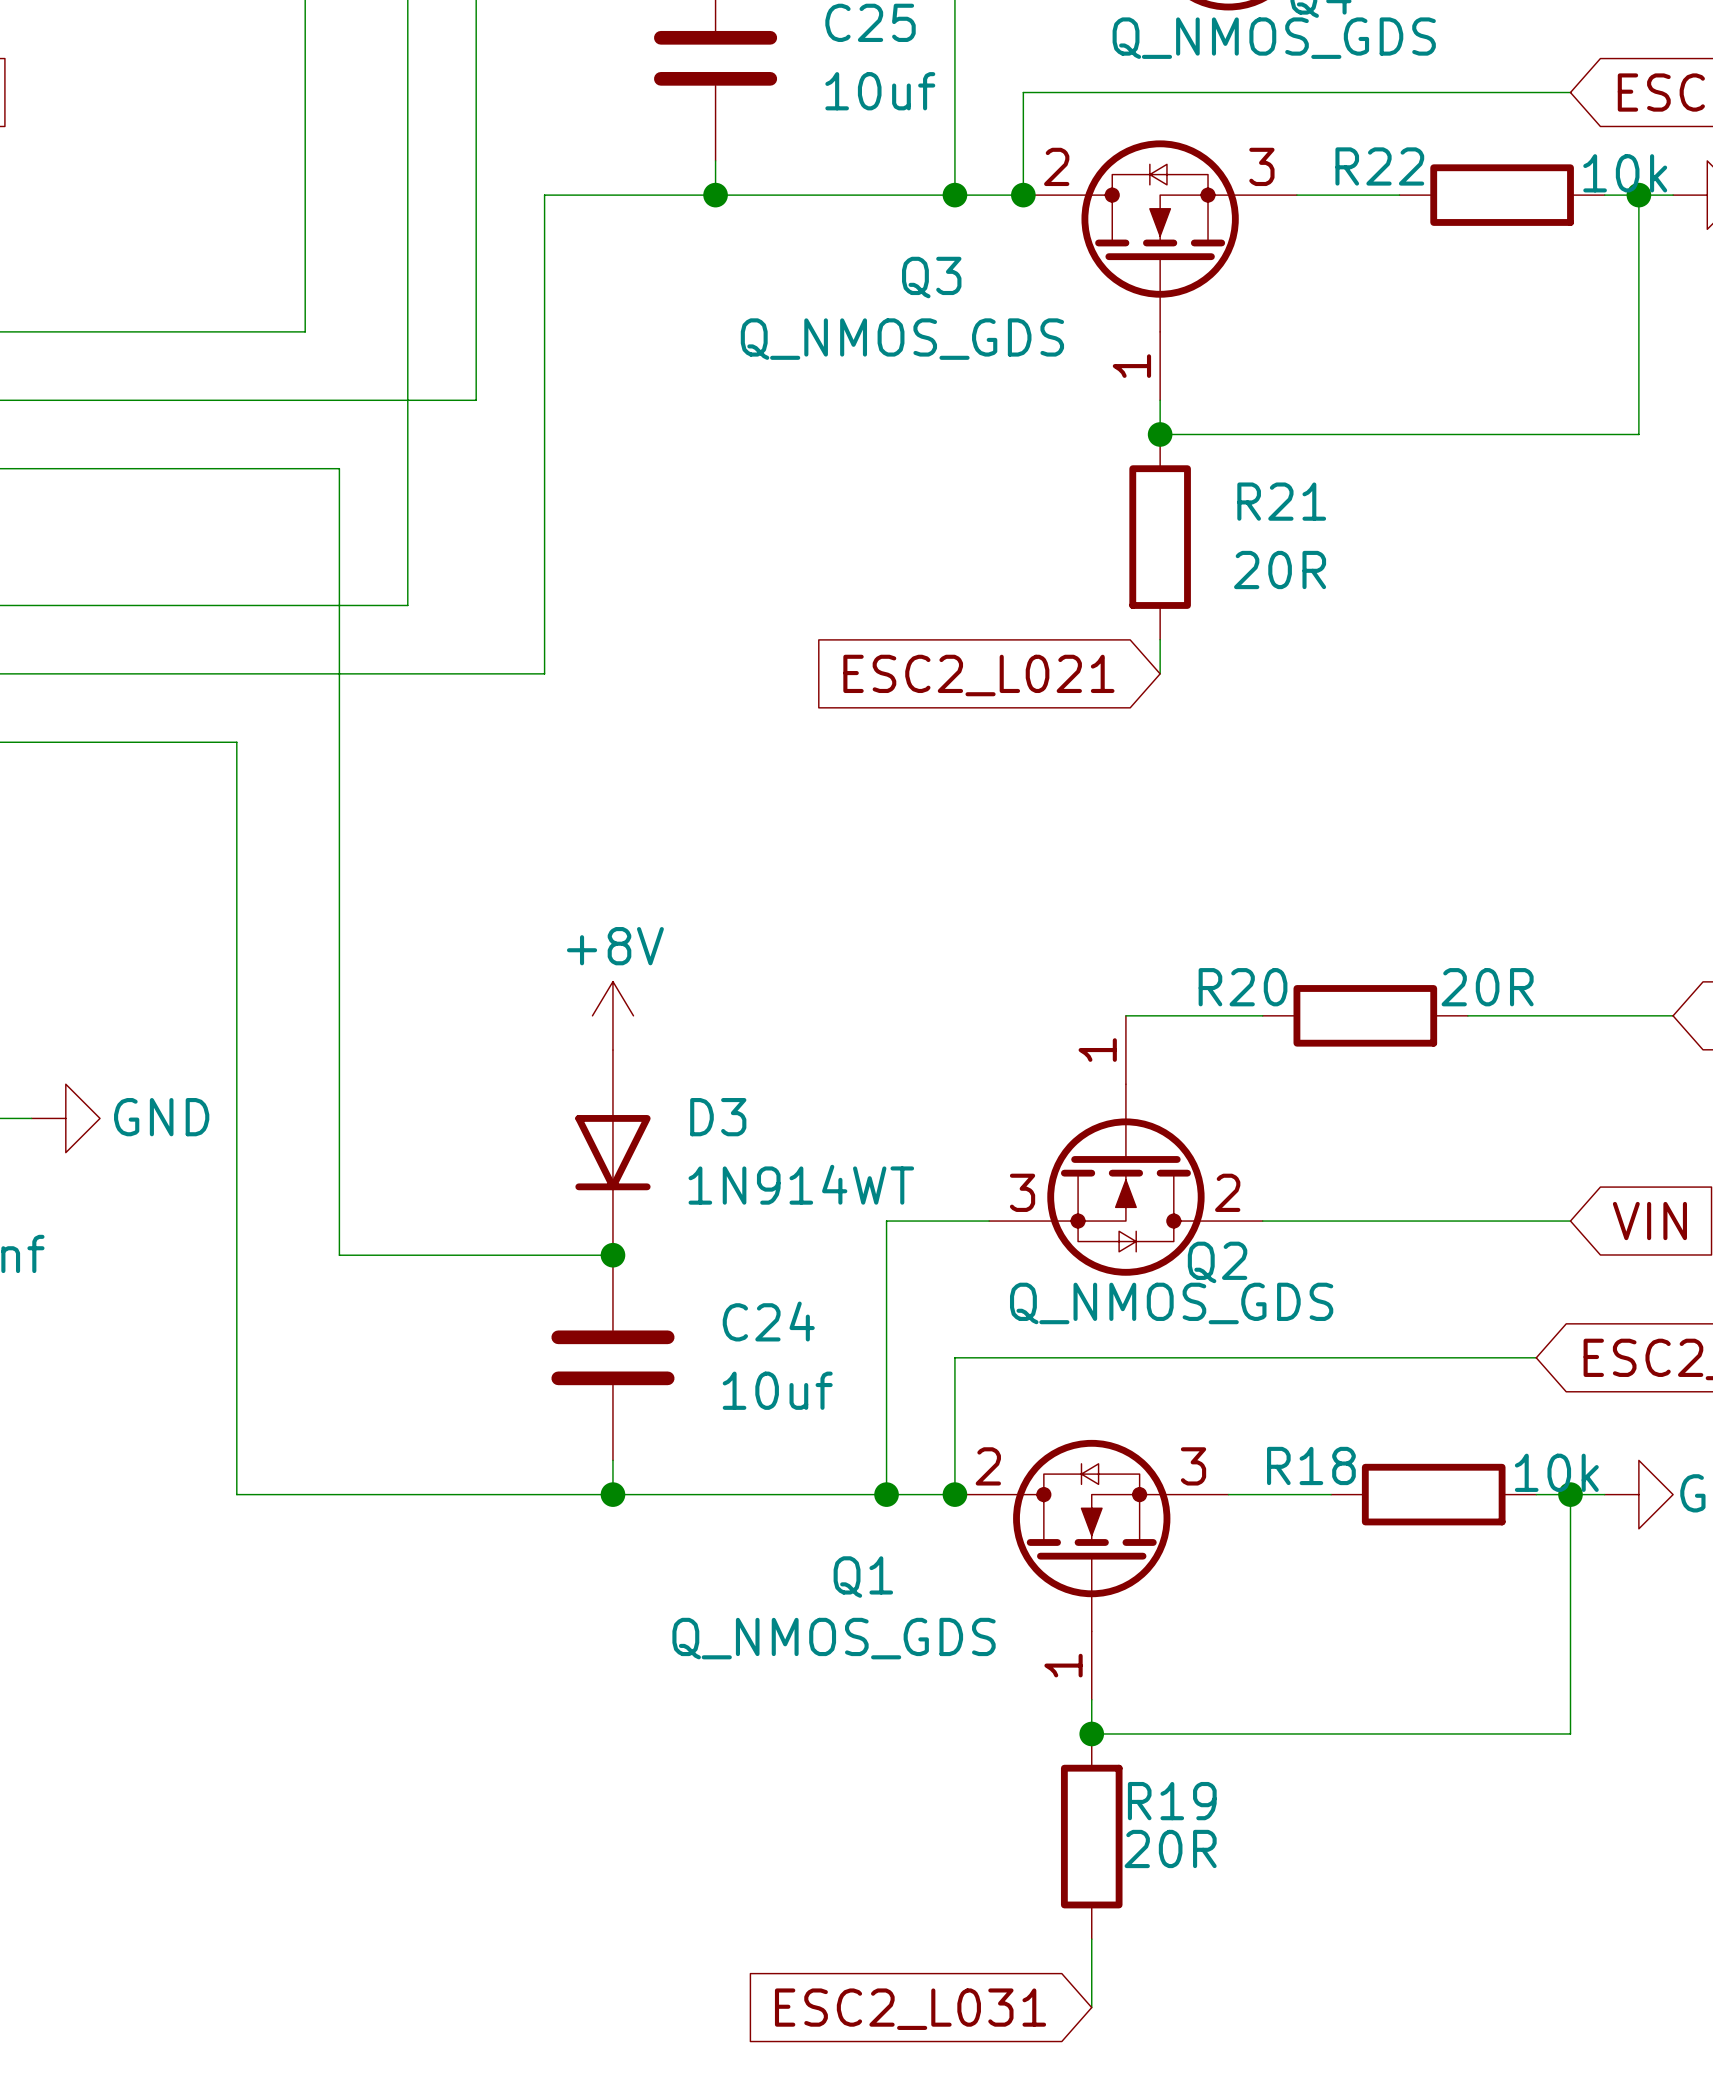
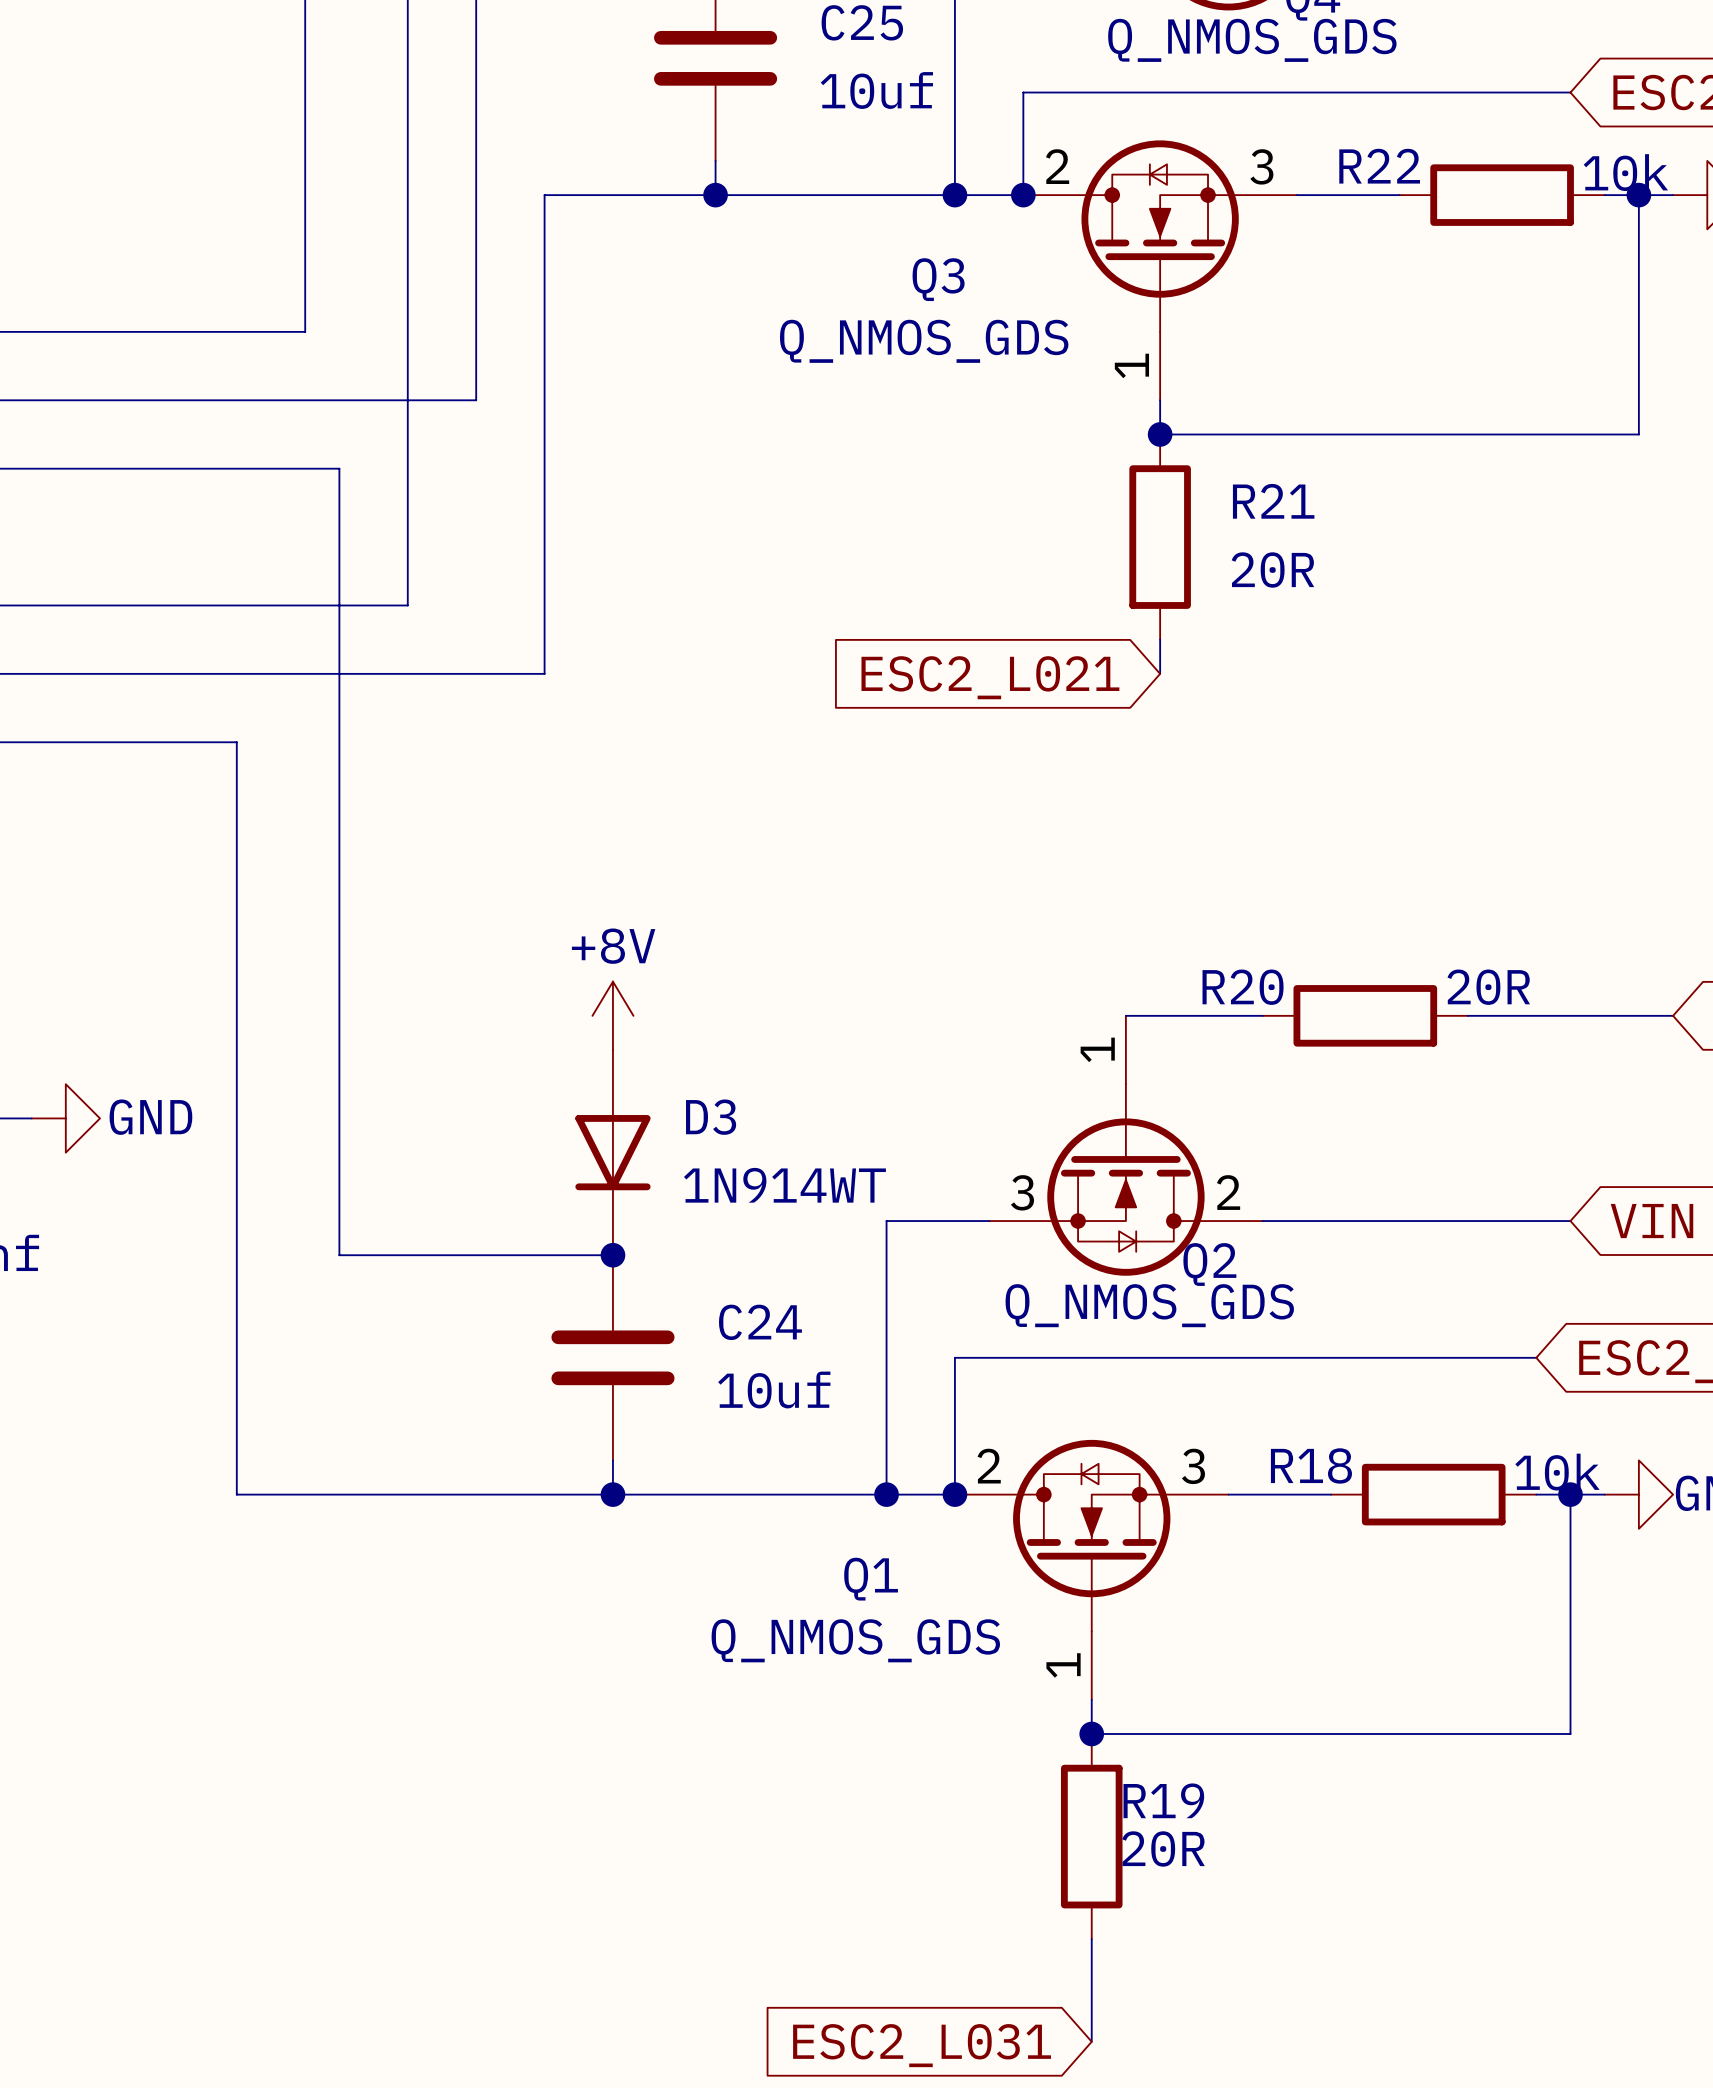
wire: none -> (1091, 2007) (1091, 2041)
global label position: ESC2_L031 (910, 2009) -> ESC2_L031 (922, 2045)

